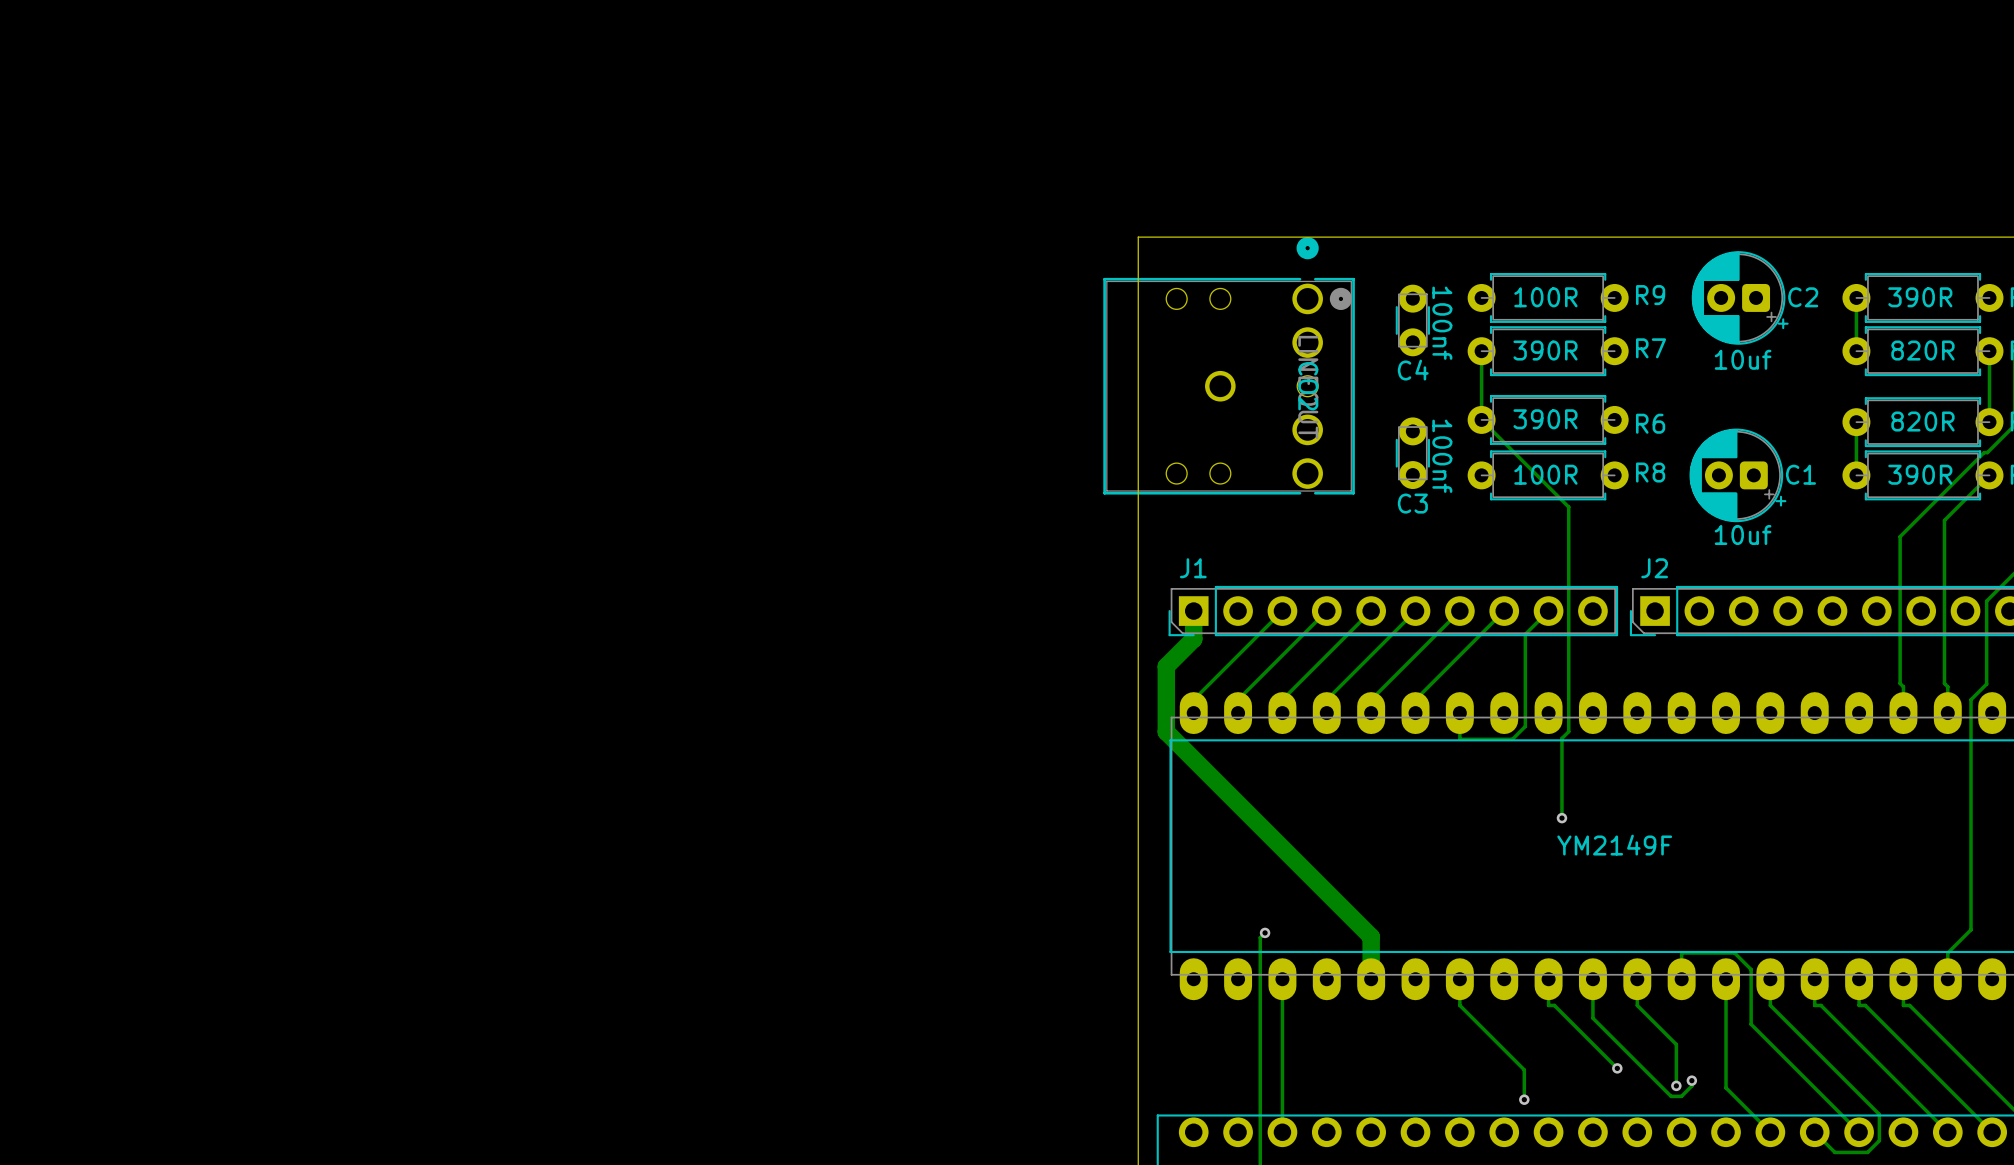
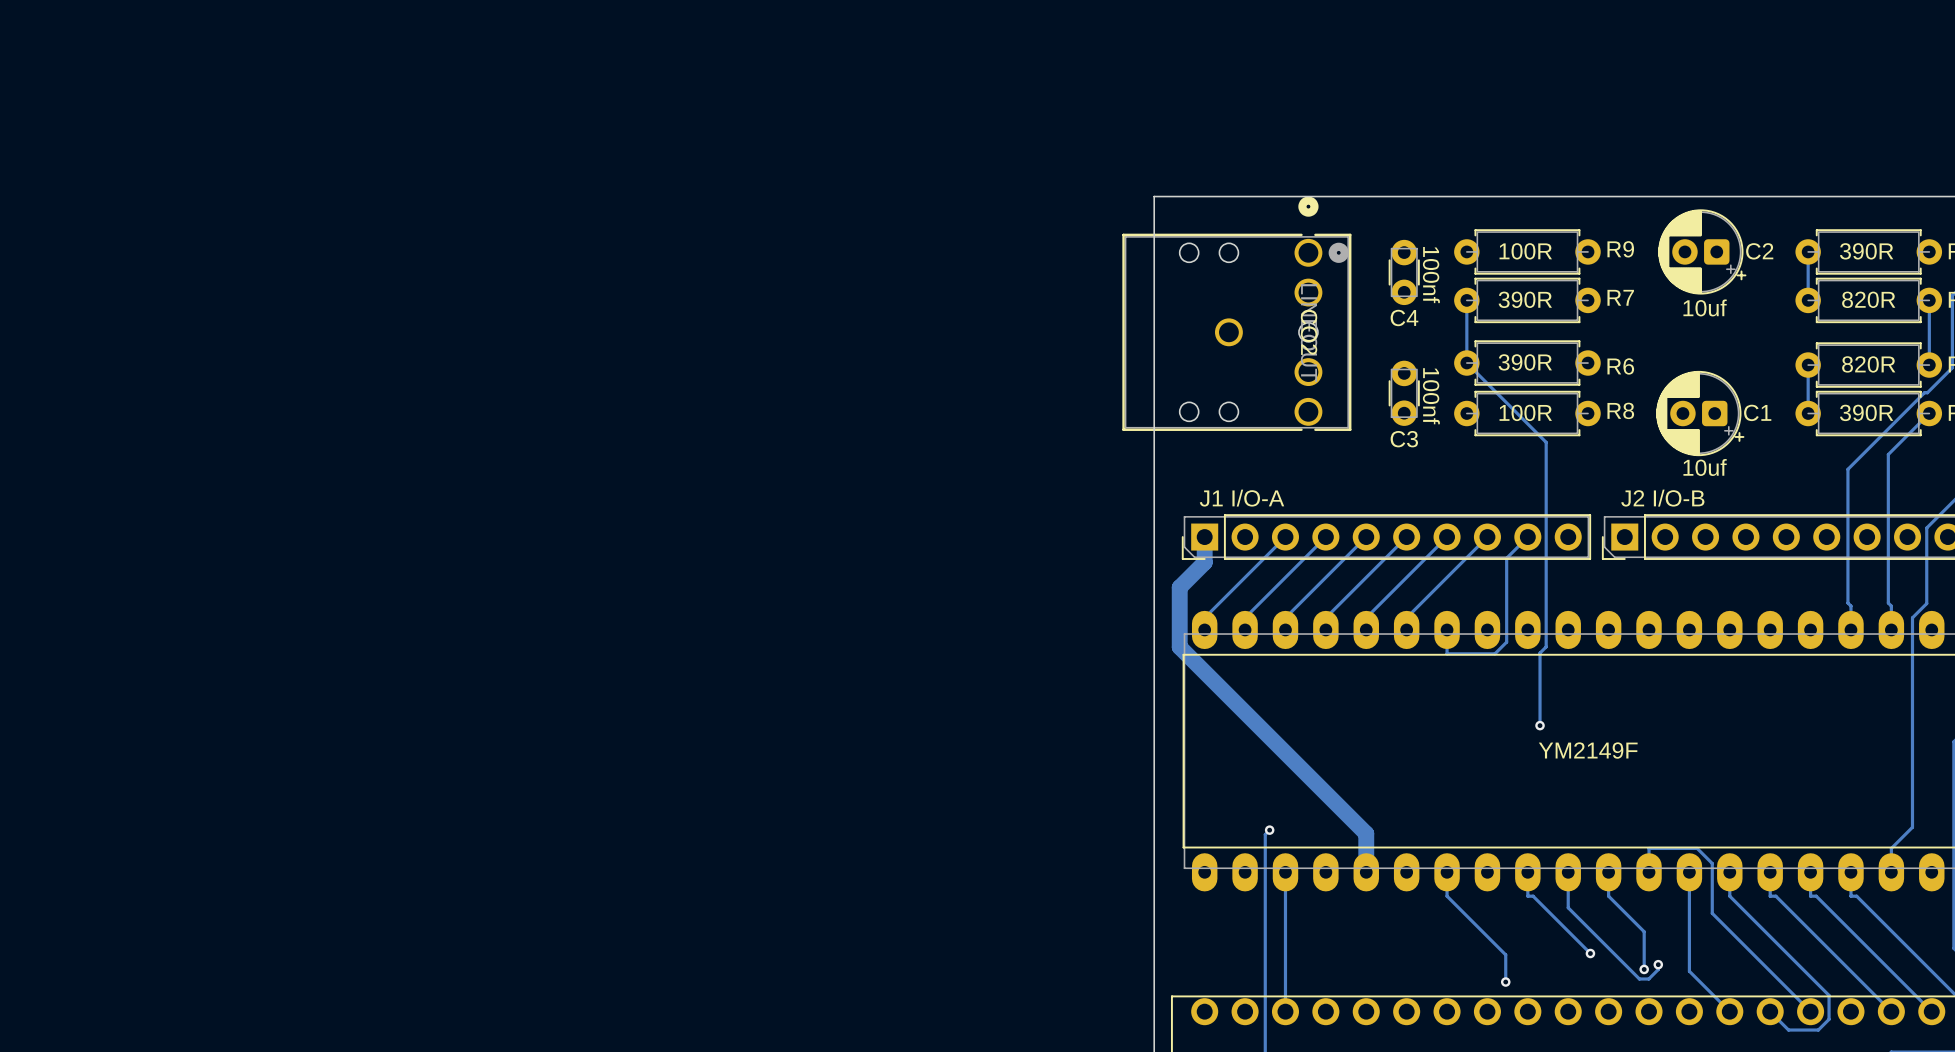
J1 name: J1 (1193, 568) -> J1 I/O-A (1242, 498)
J2 name: J2 (1654, 568) -> J2 I/O-B (1662, 498)

